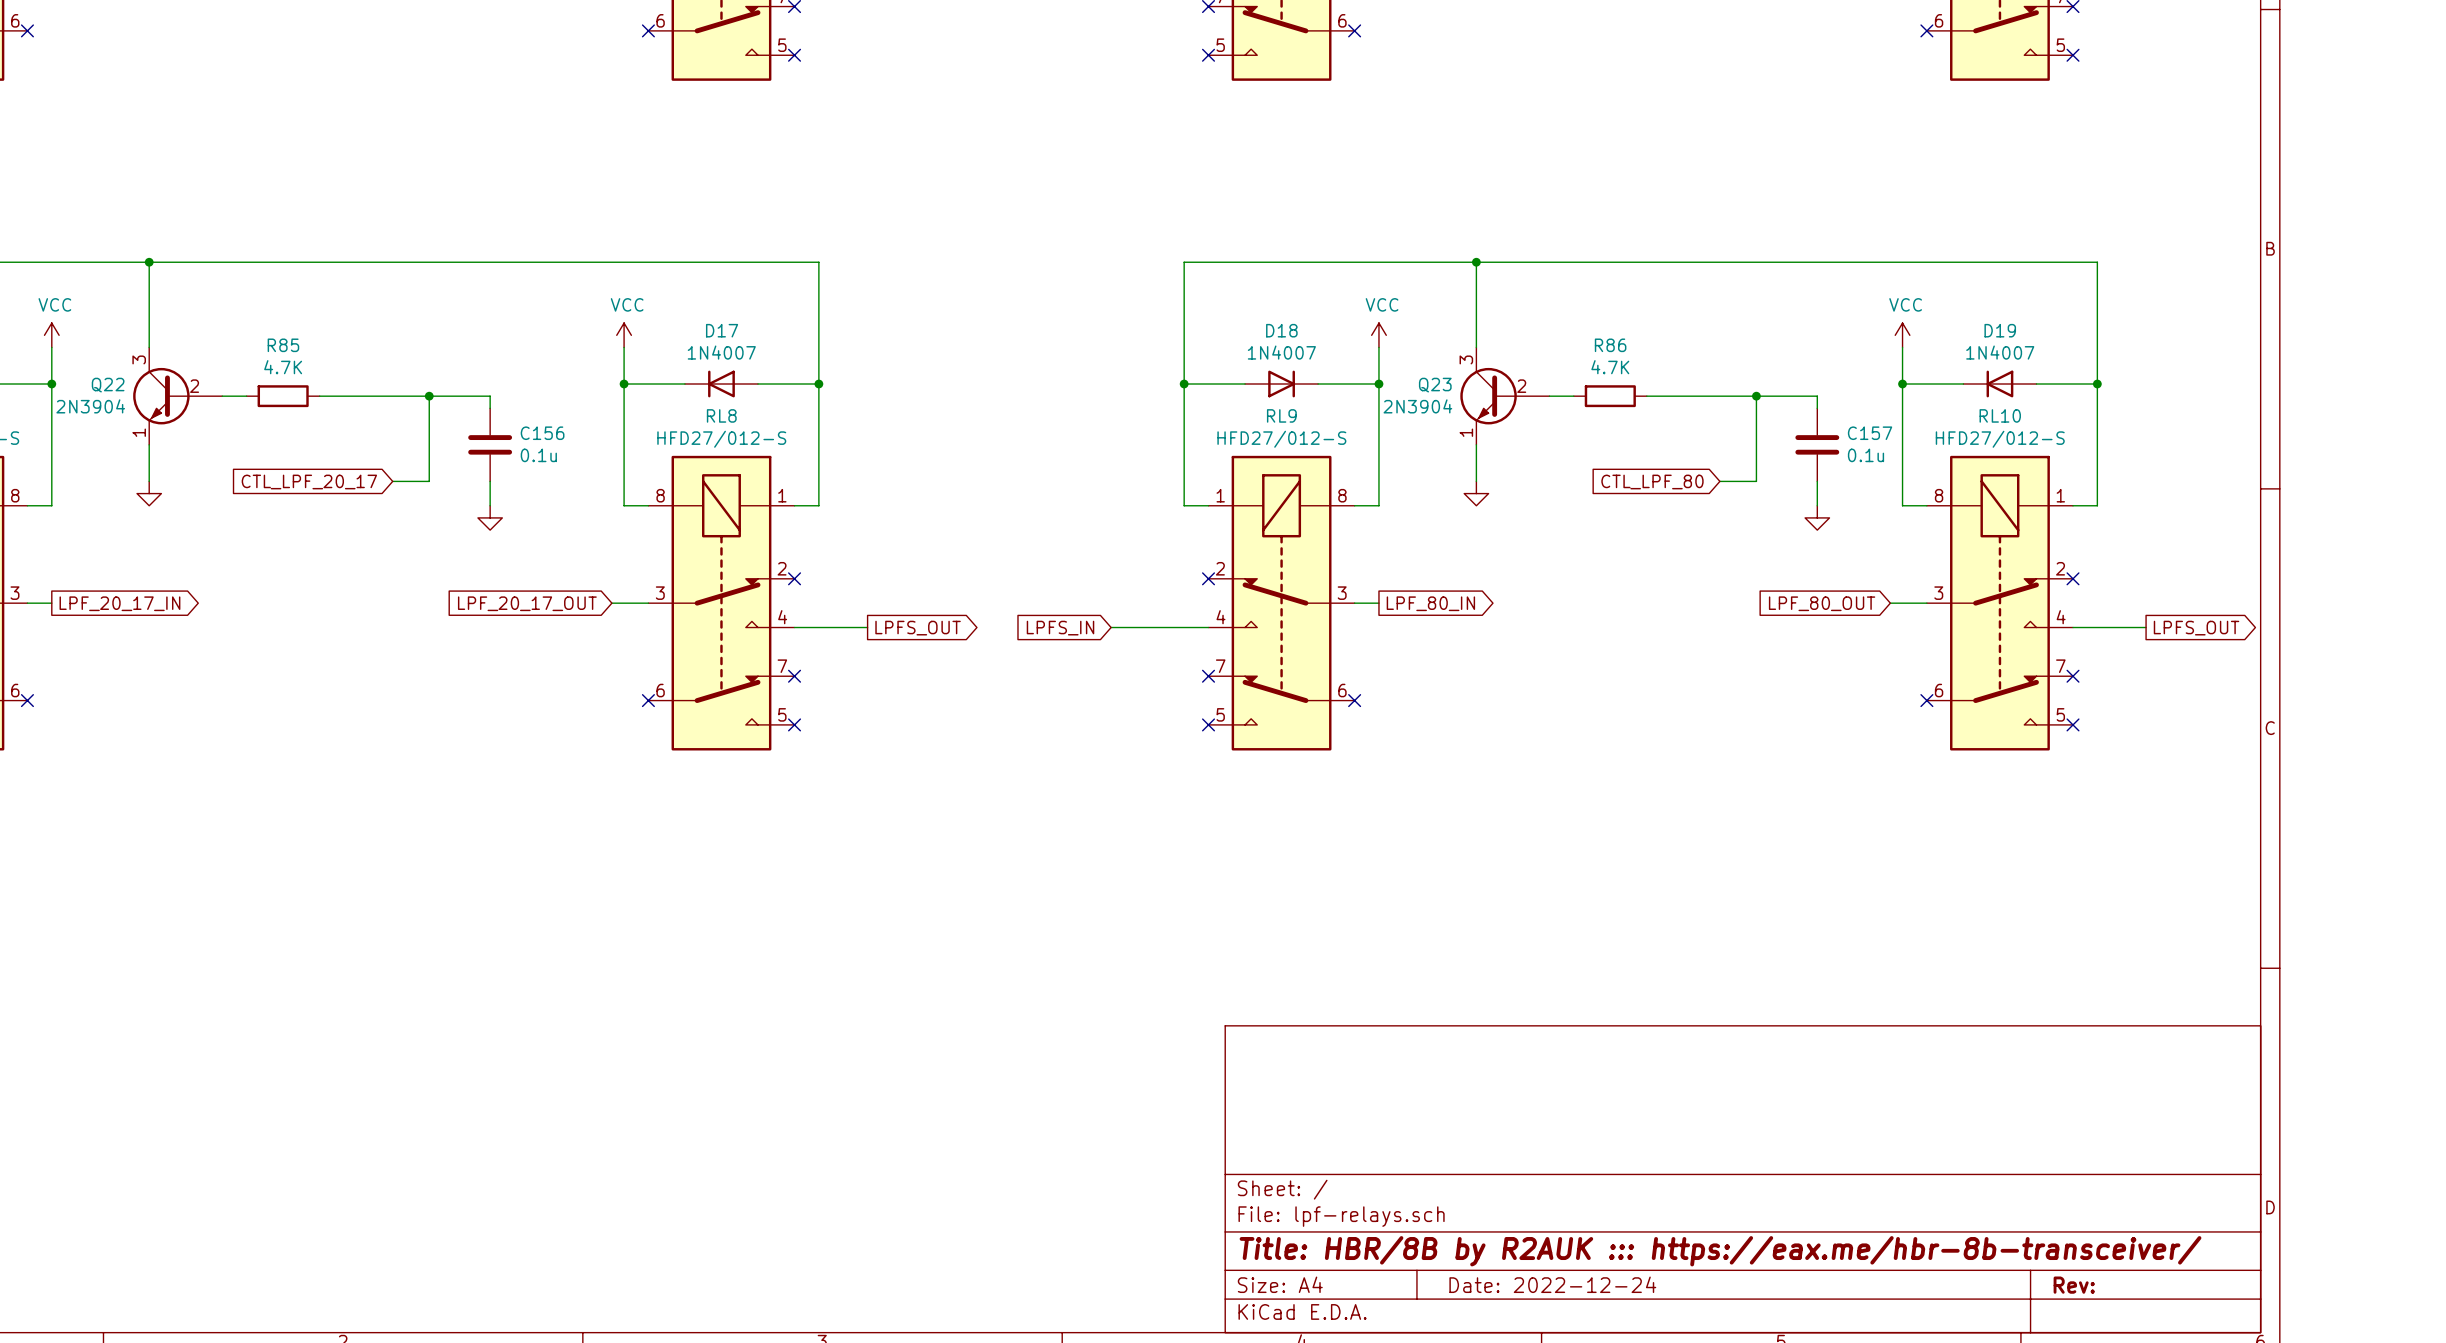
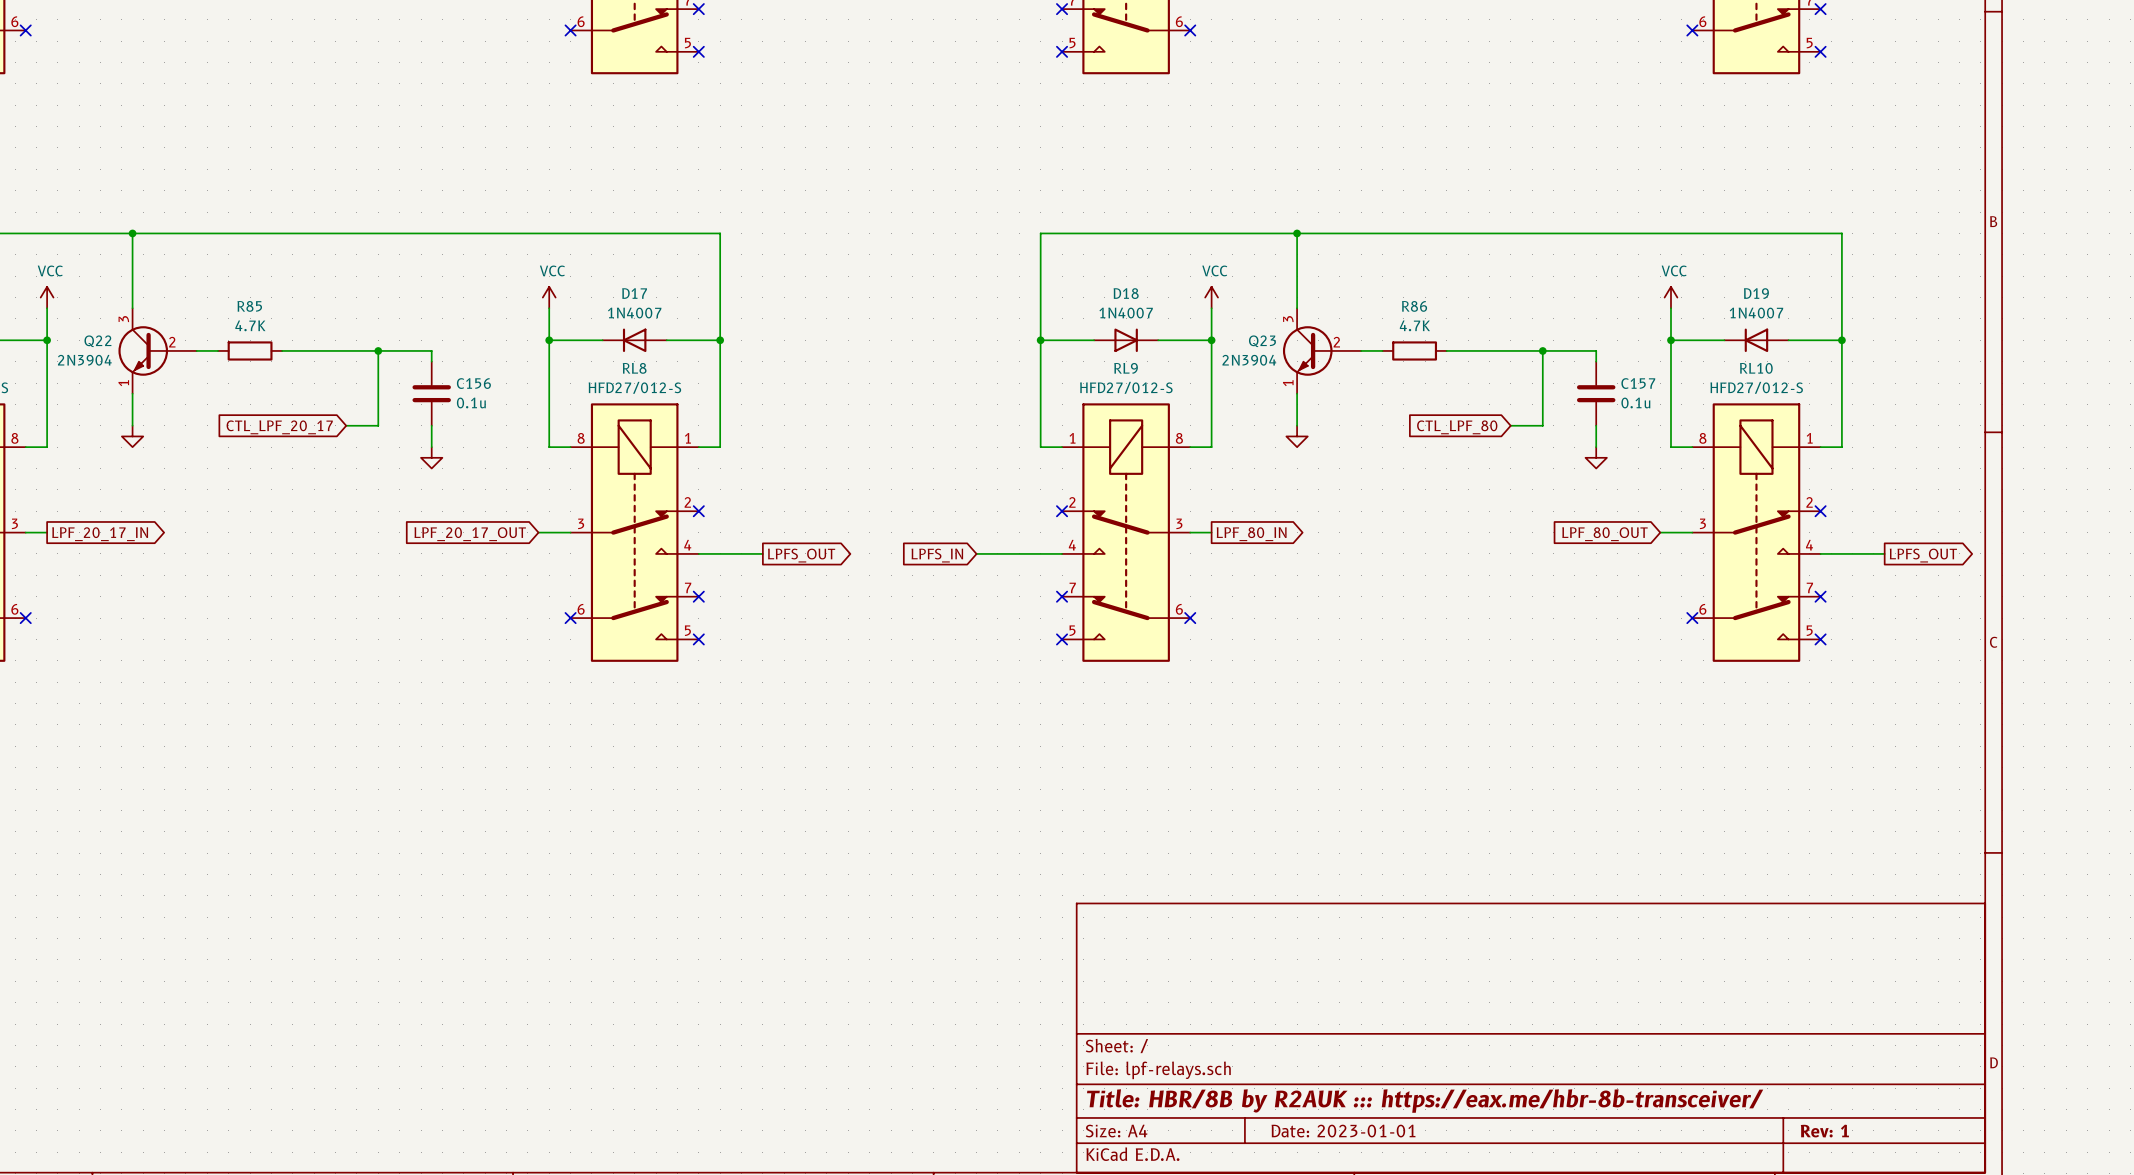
title block: Date: 2022-12-24 (1552, 1284) -> Date: 2023-01-01 (1343, 1131)
title block: Rev: (2074, 1285) -> Rev: 1 (1824, 1131)

